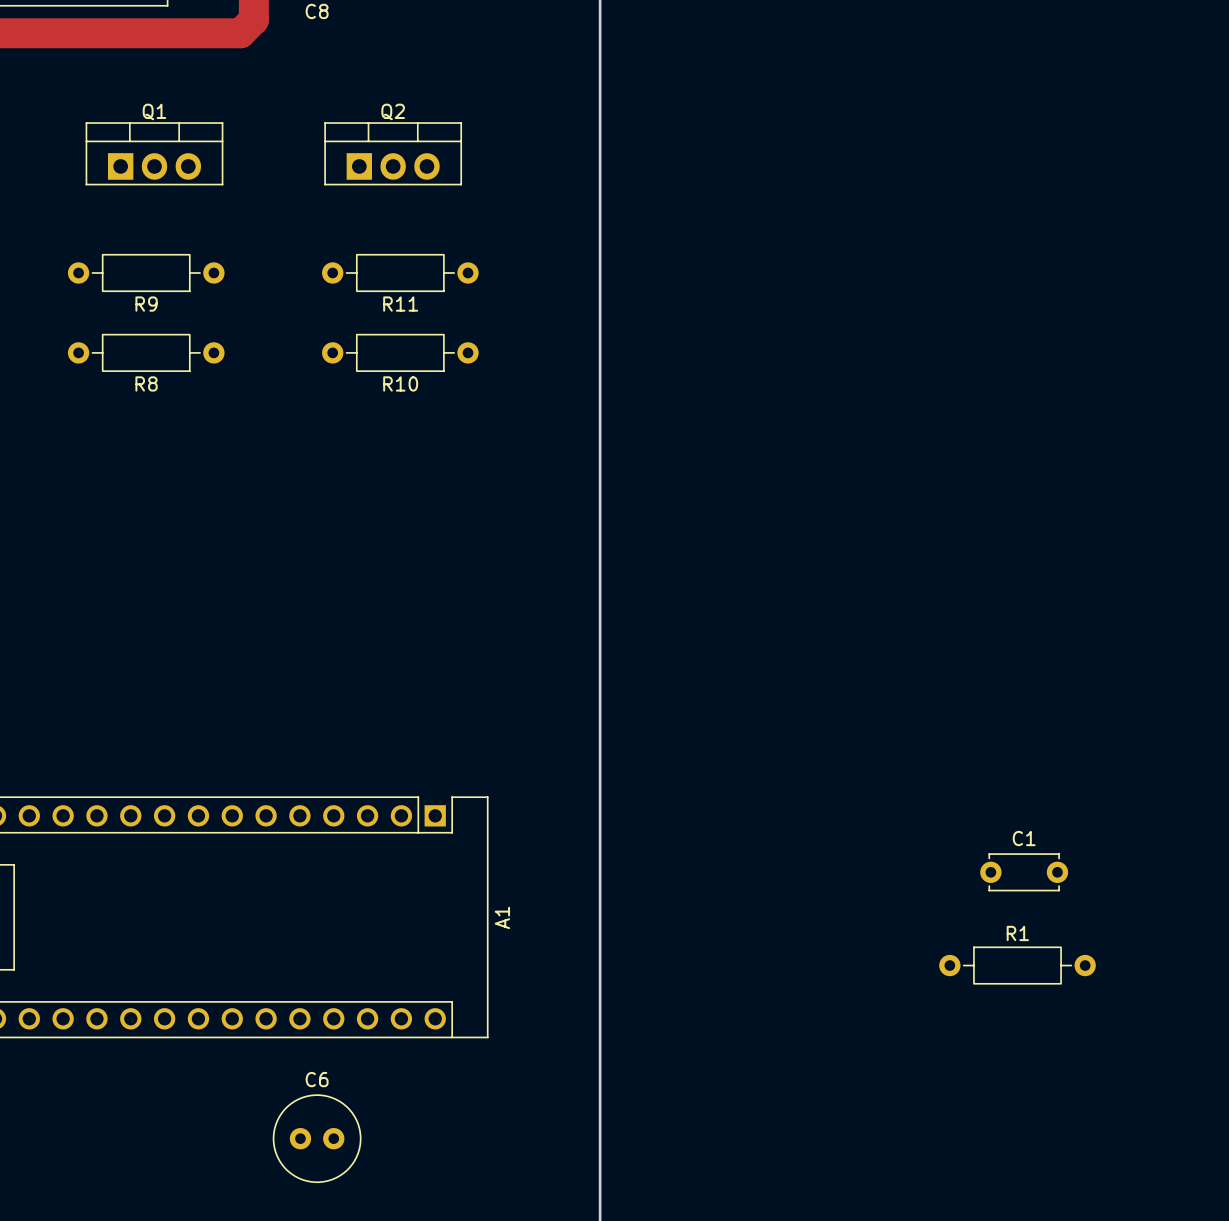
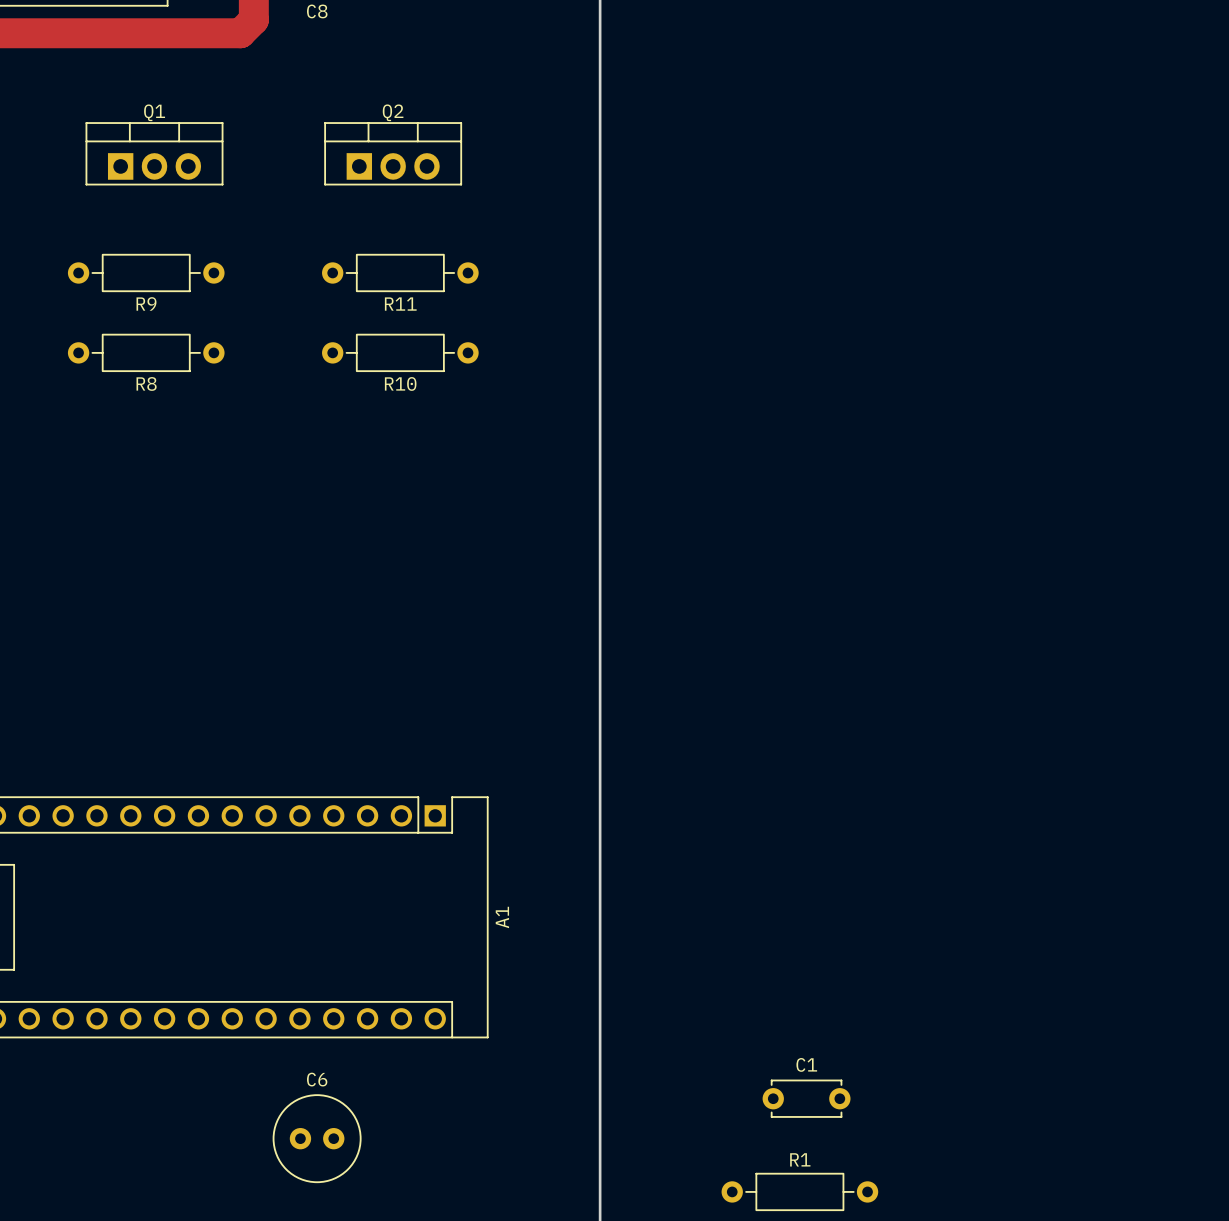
C1 position: (1024, 872) -> (806, 1098)
R1 position: (1017, 965) -> (799, 1191)

